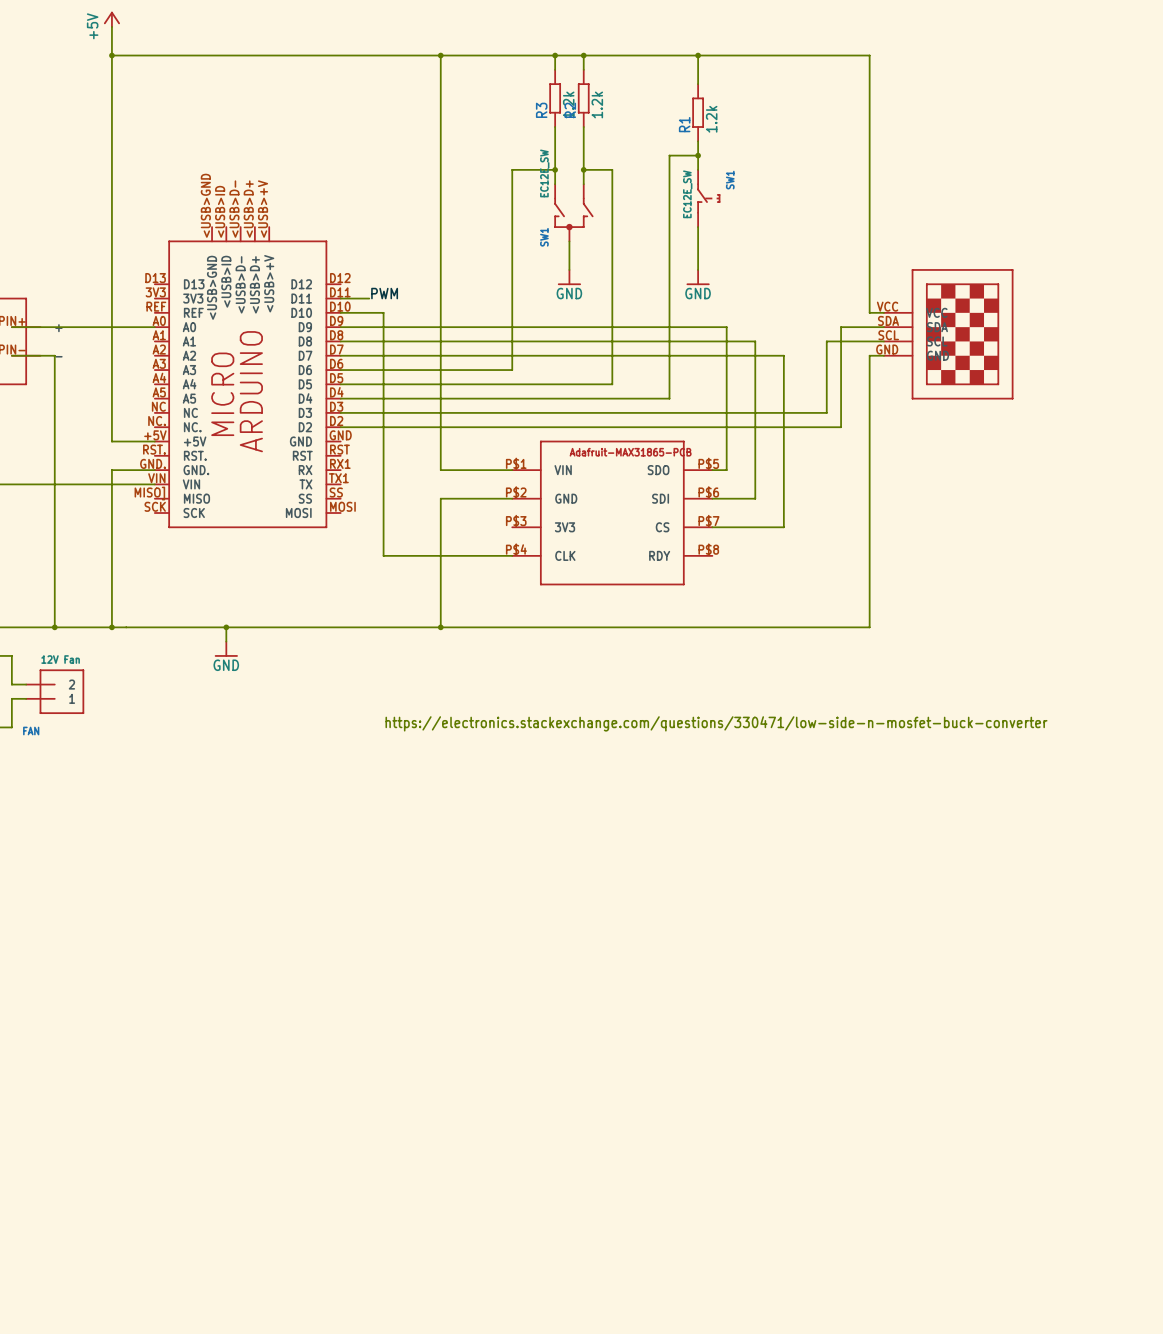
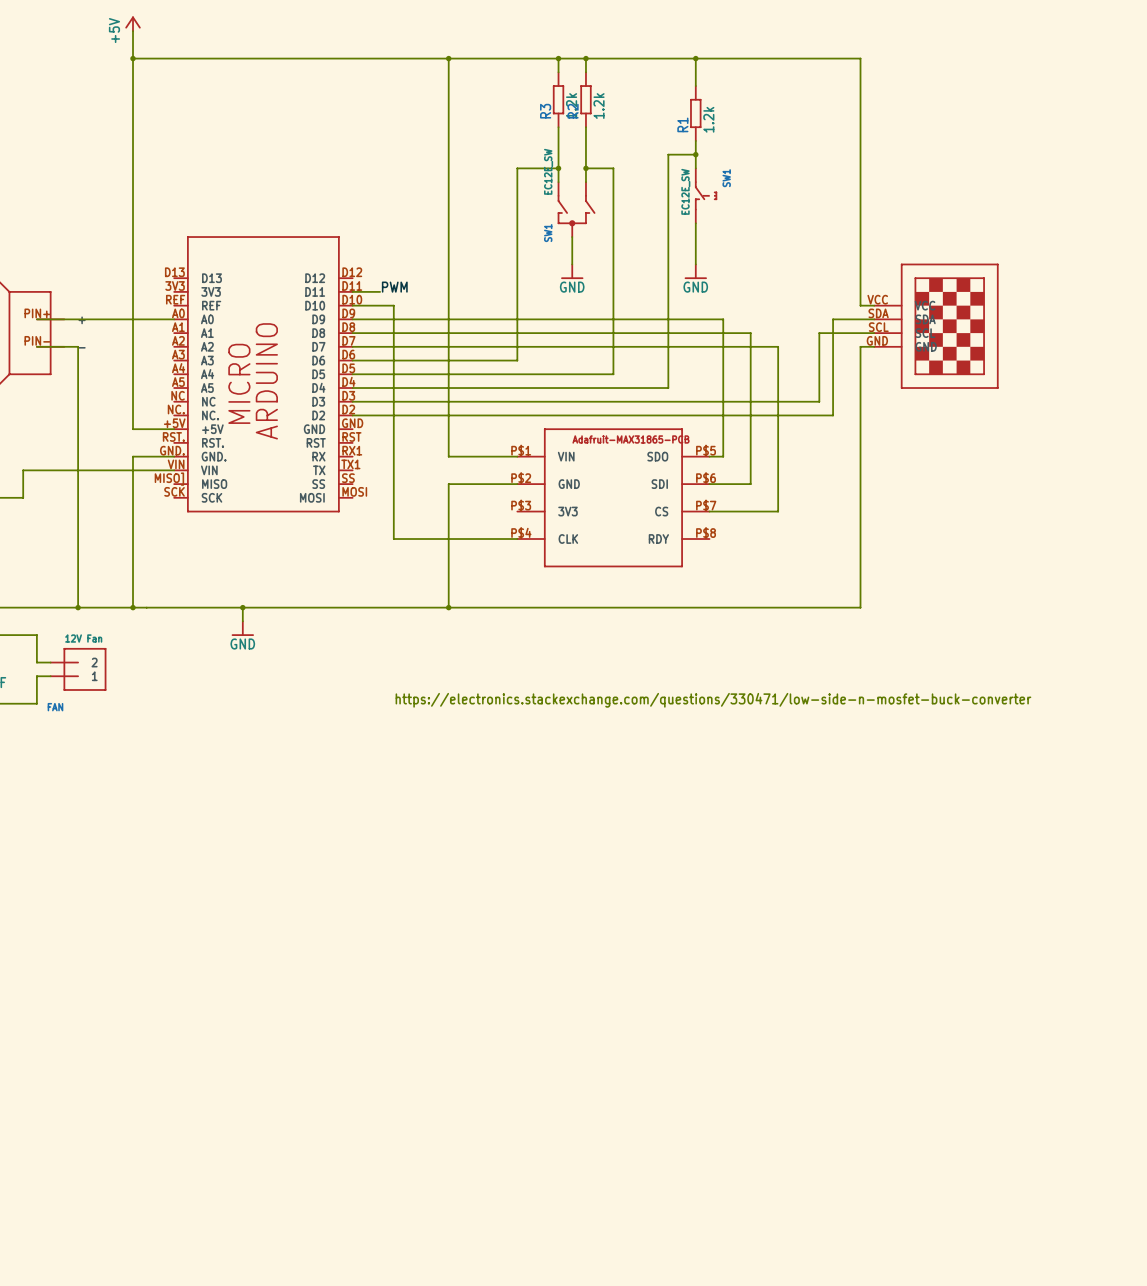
part: (247, 377) -> none
part: none -> (263, 374)

